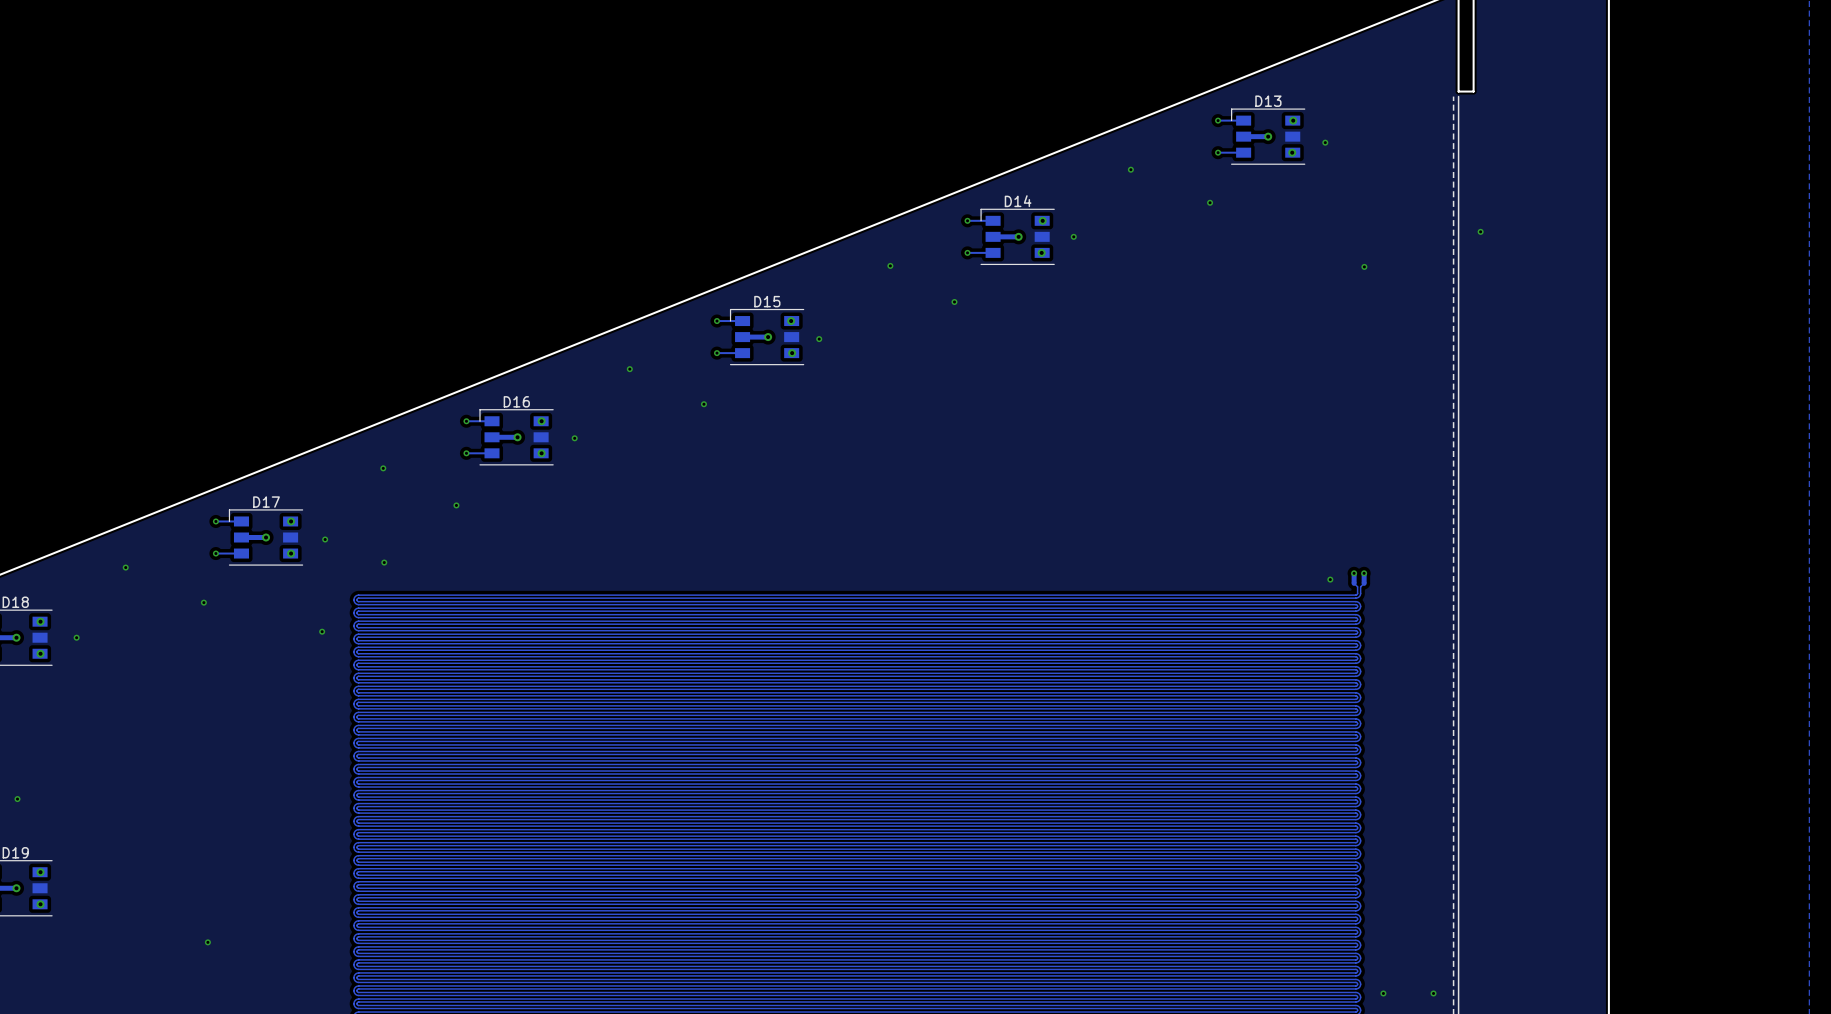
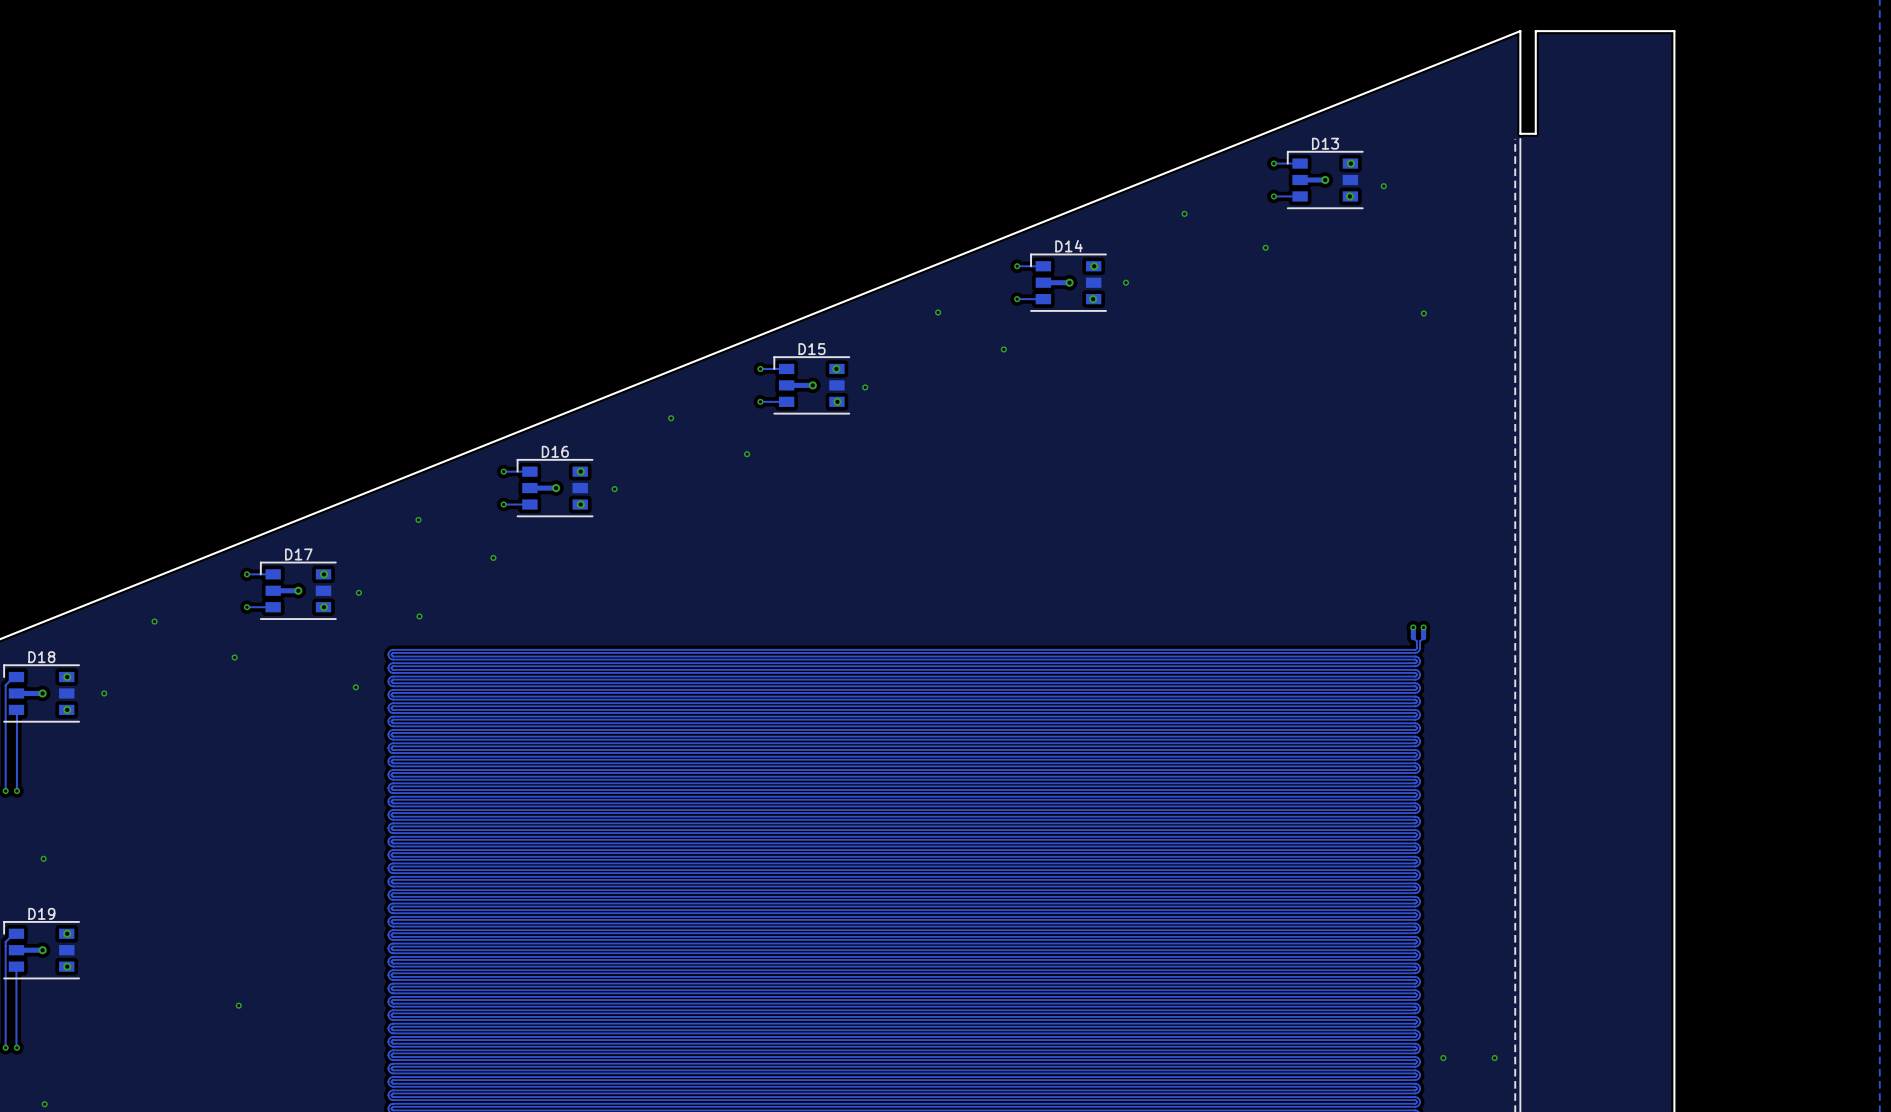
via: (1480, 231) -> none
via: (1330, 579) -> none

